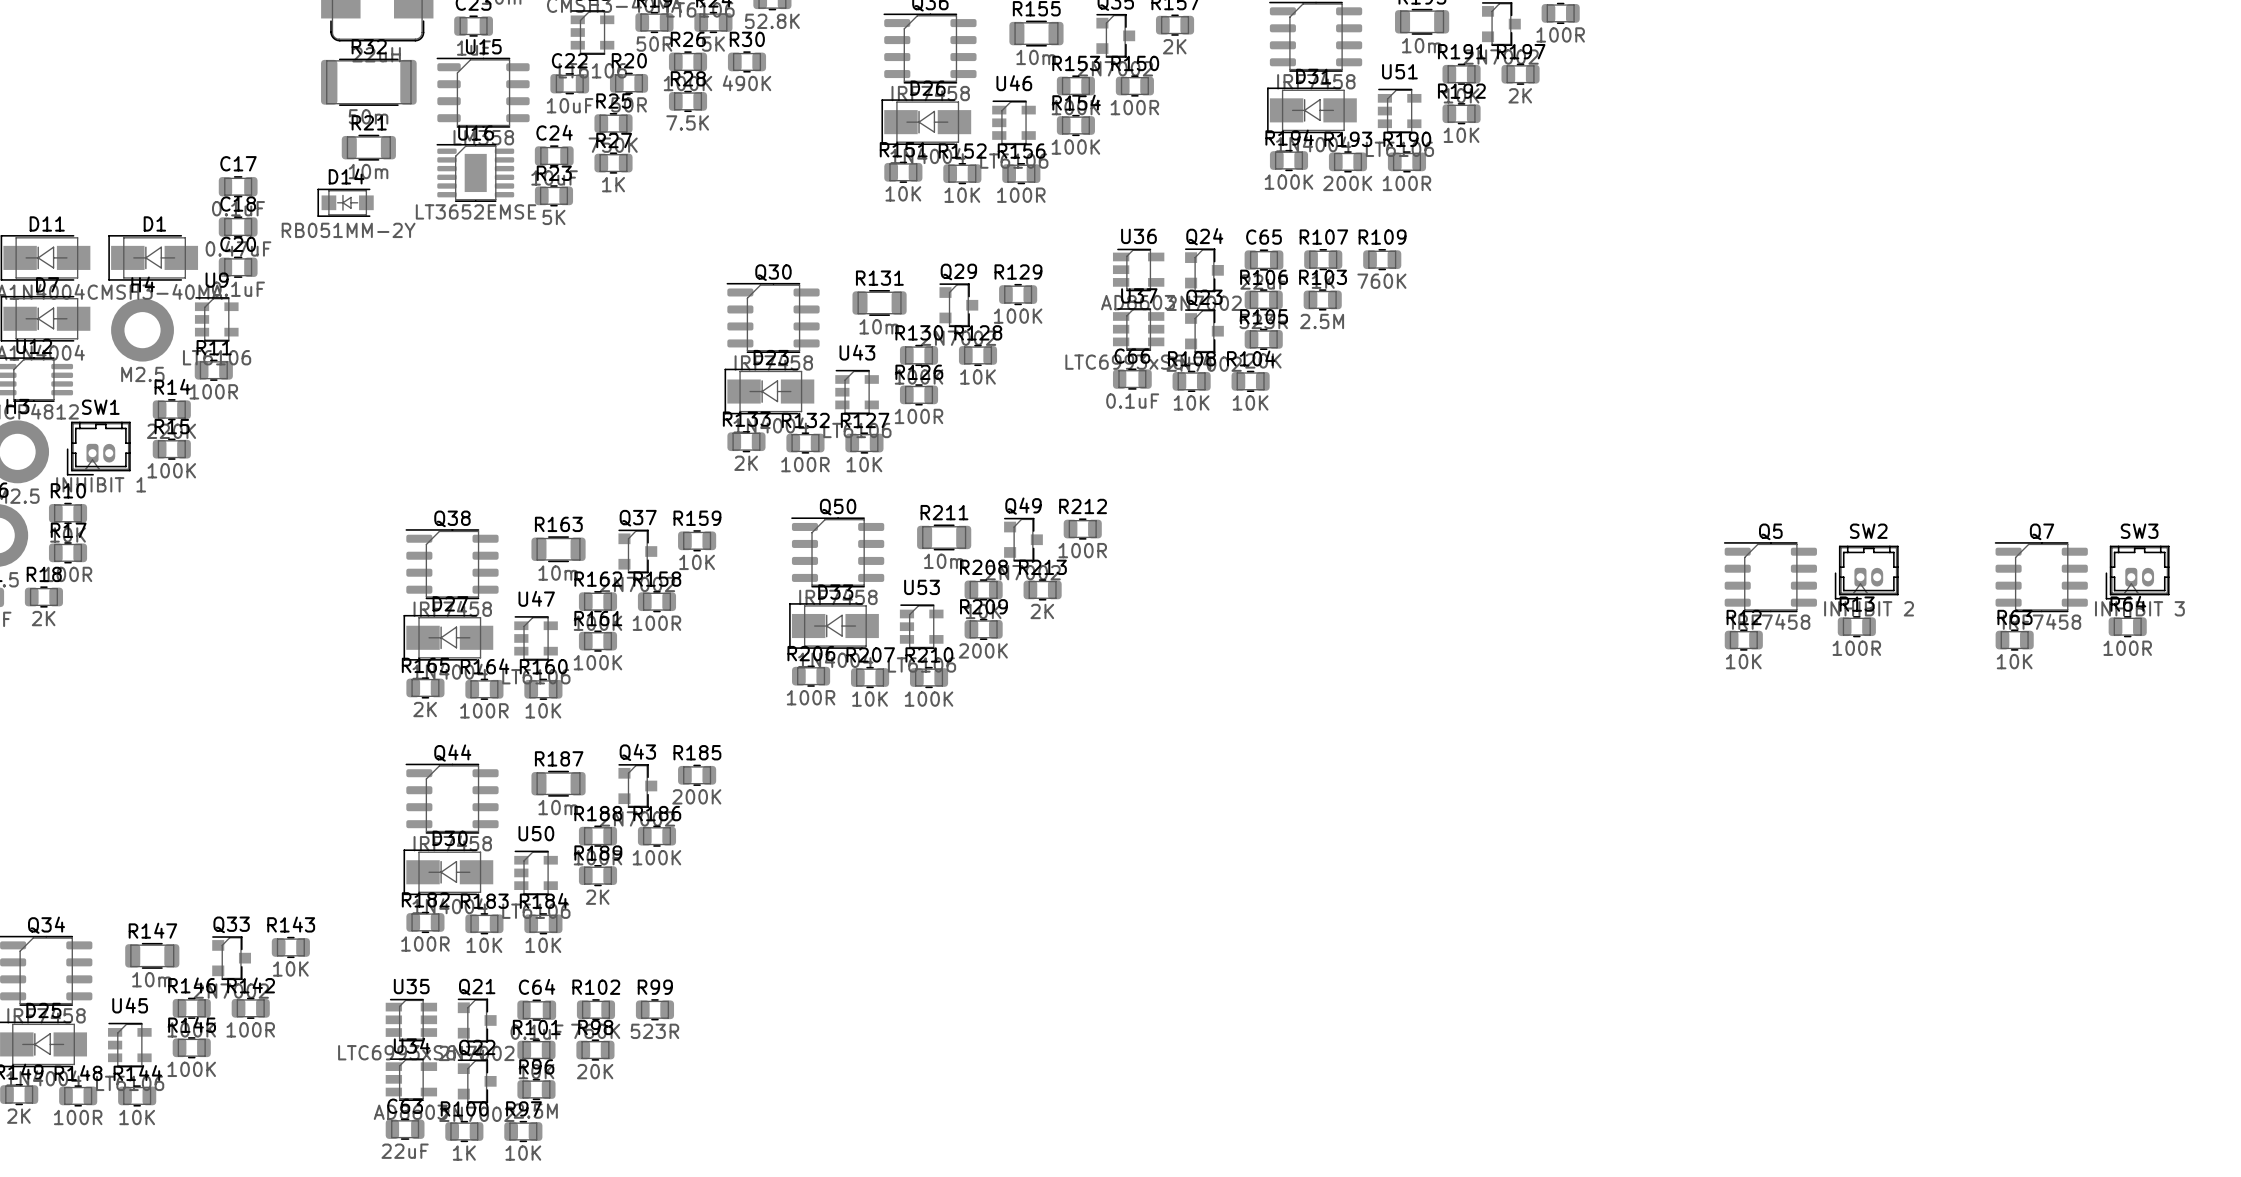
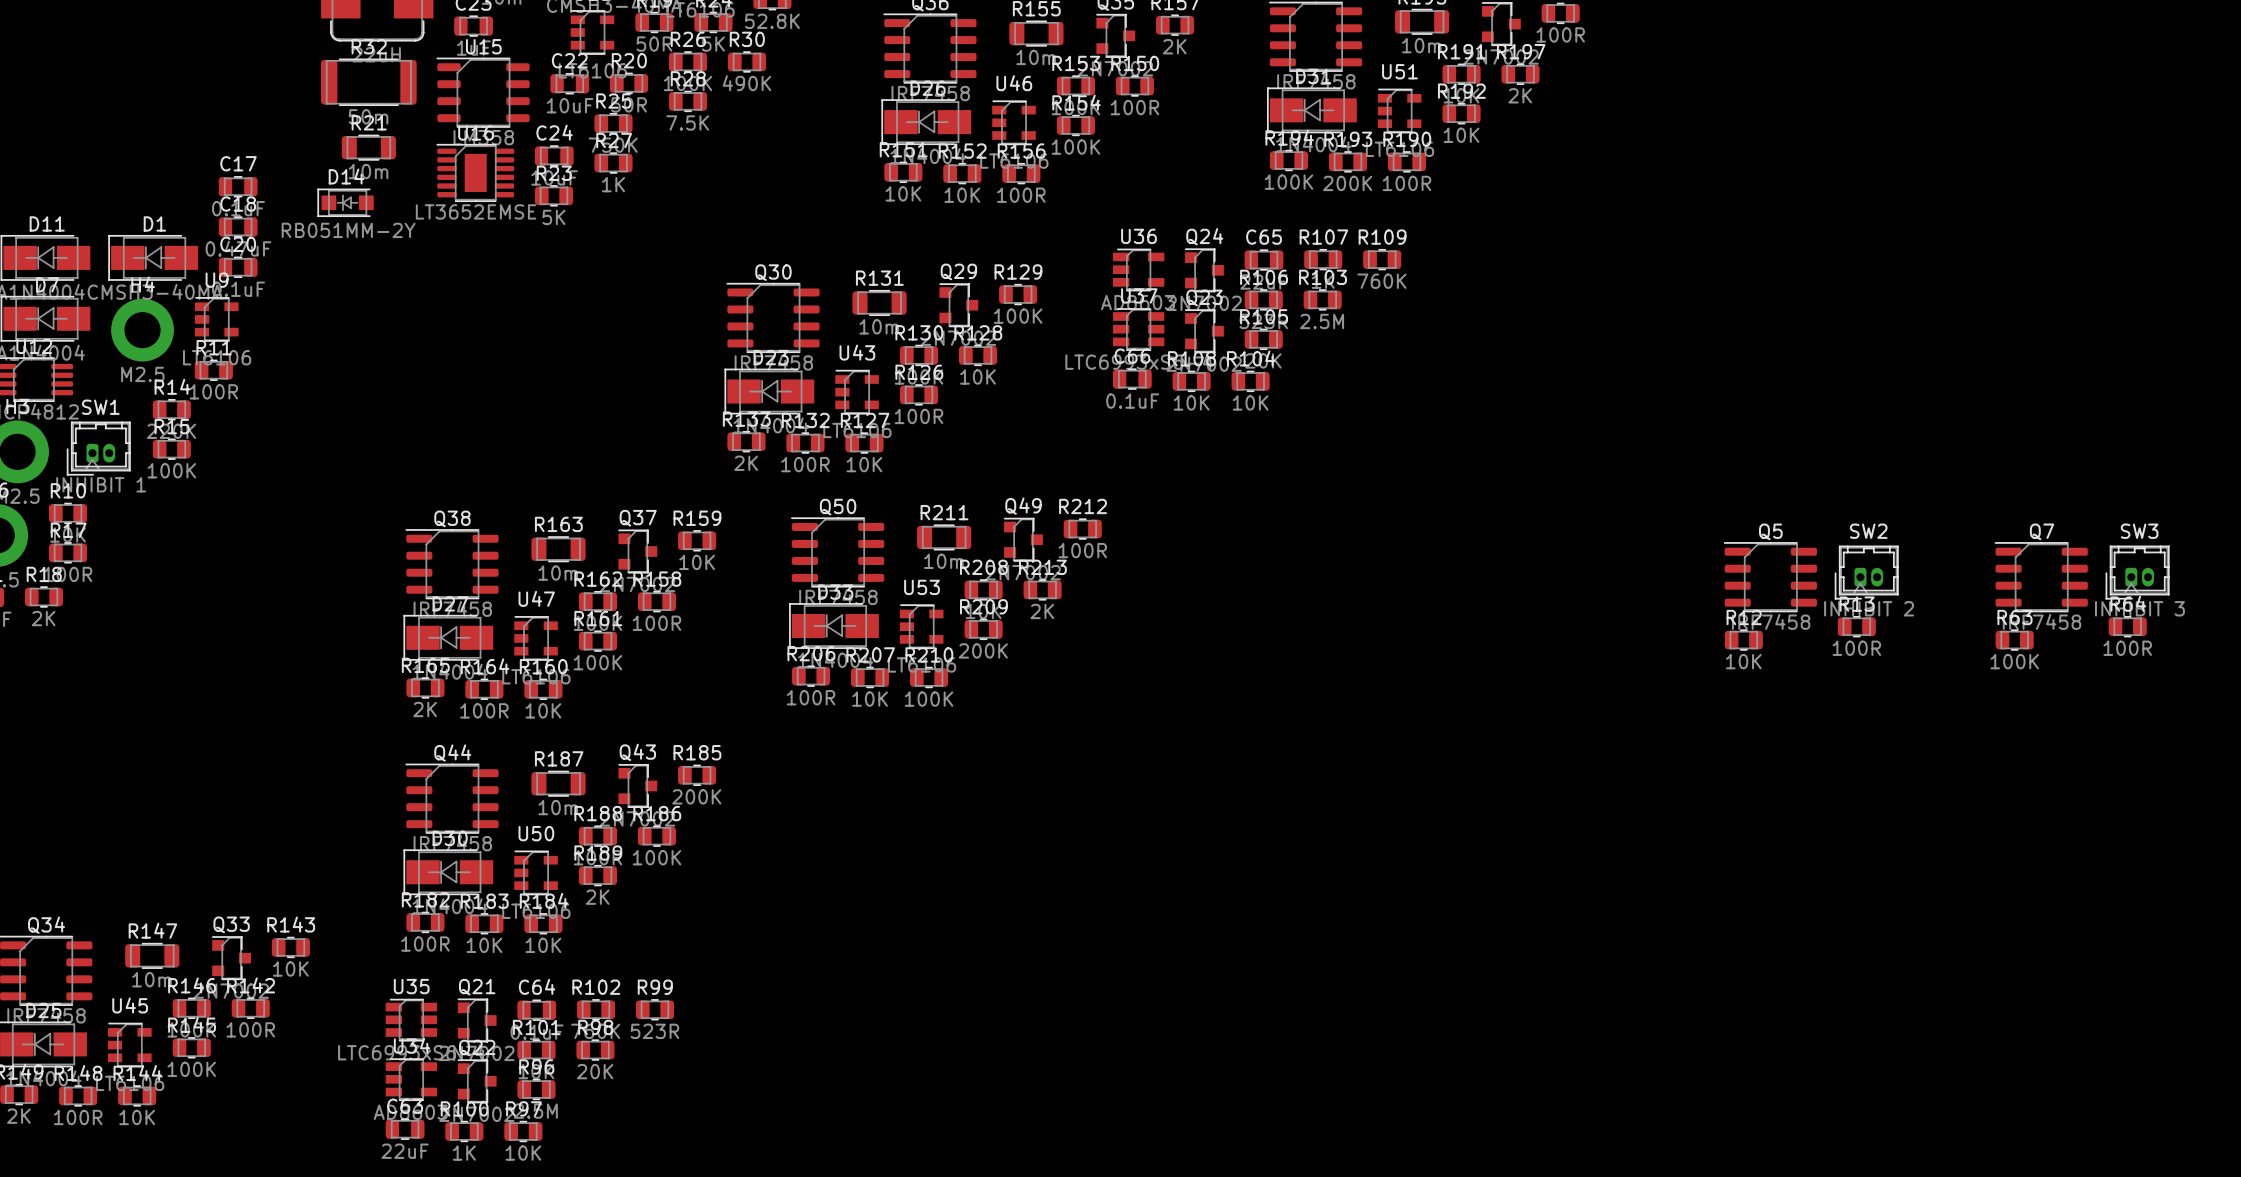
R63 value: 10K (2014, 661) -> 100K (2014, 661)

